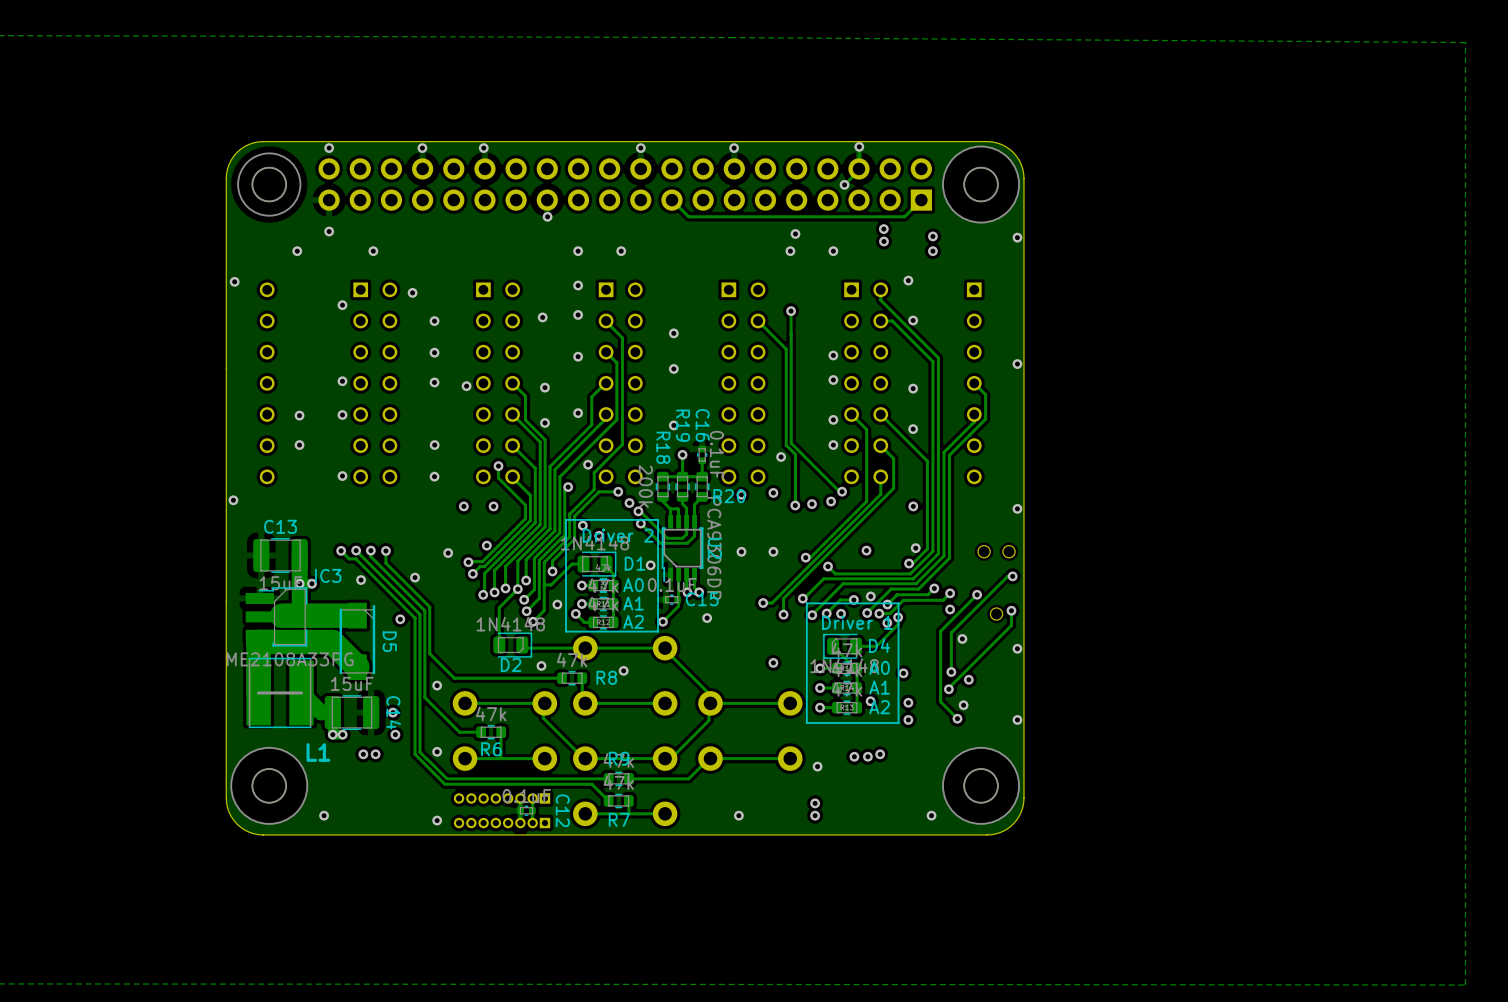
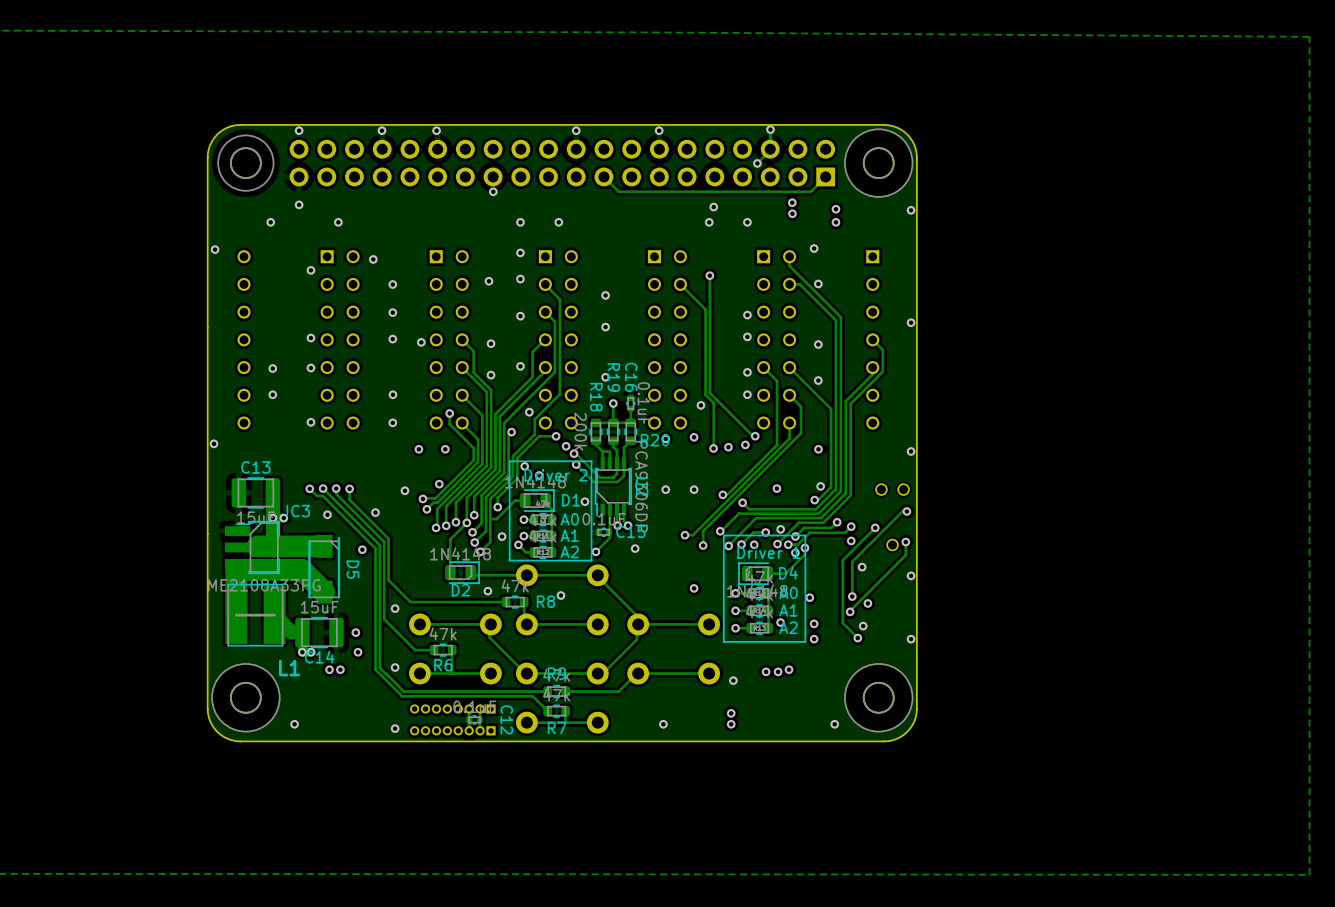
C14 name rotation: 0° (393, 712) -> 90° counterclockwise (319, 657)
C14 name position: C14 (393, 712) -> C14 (319, 657)

